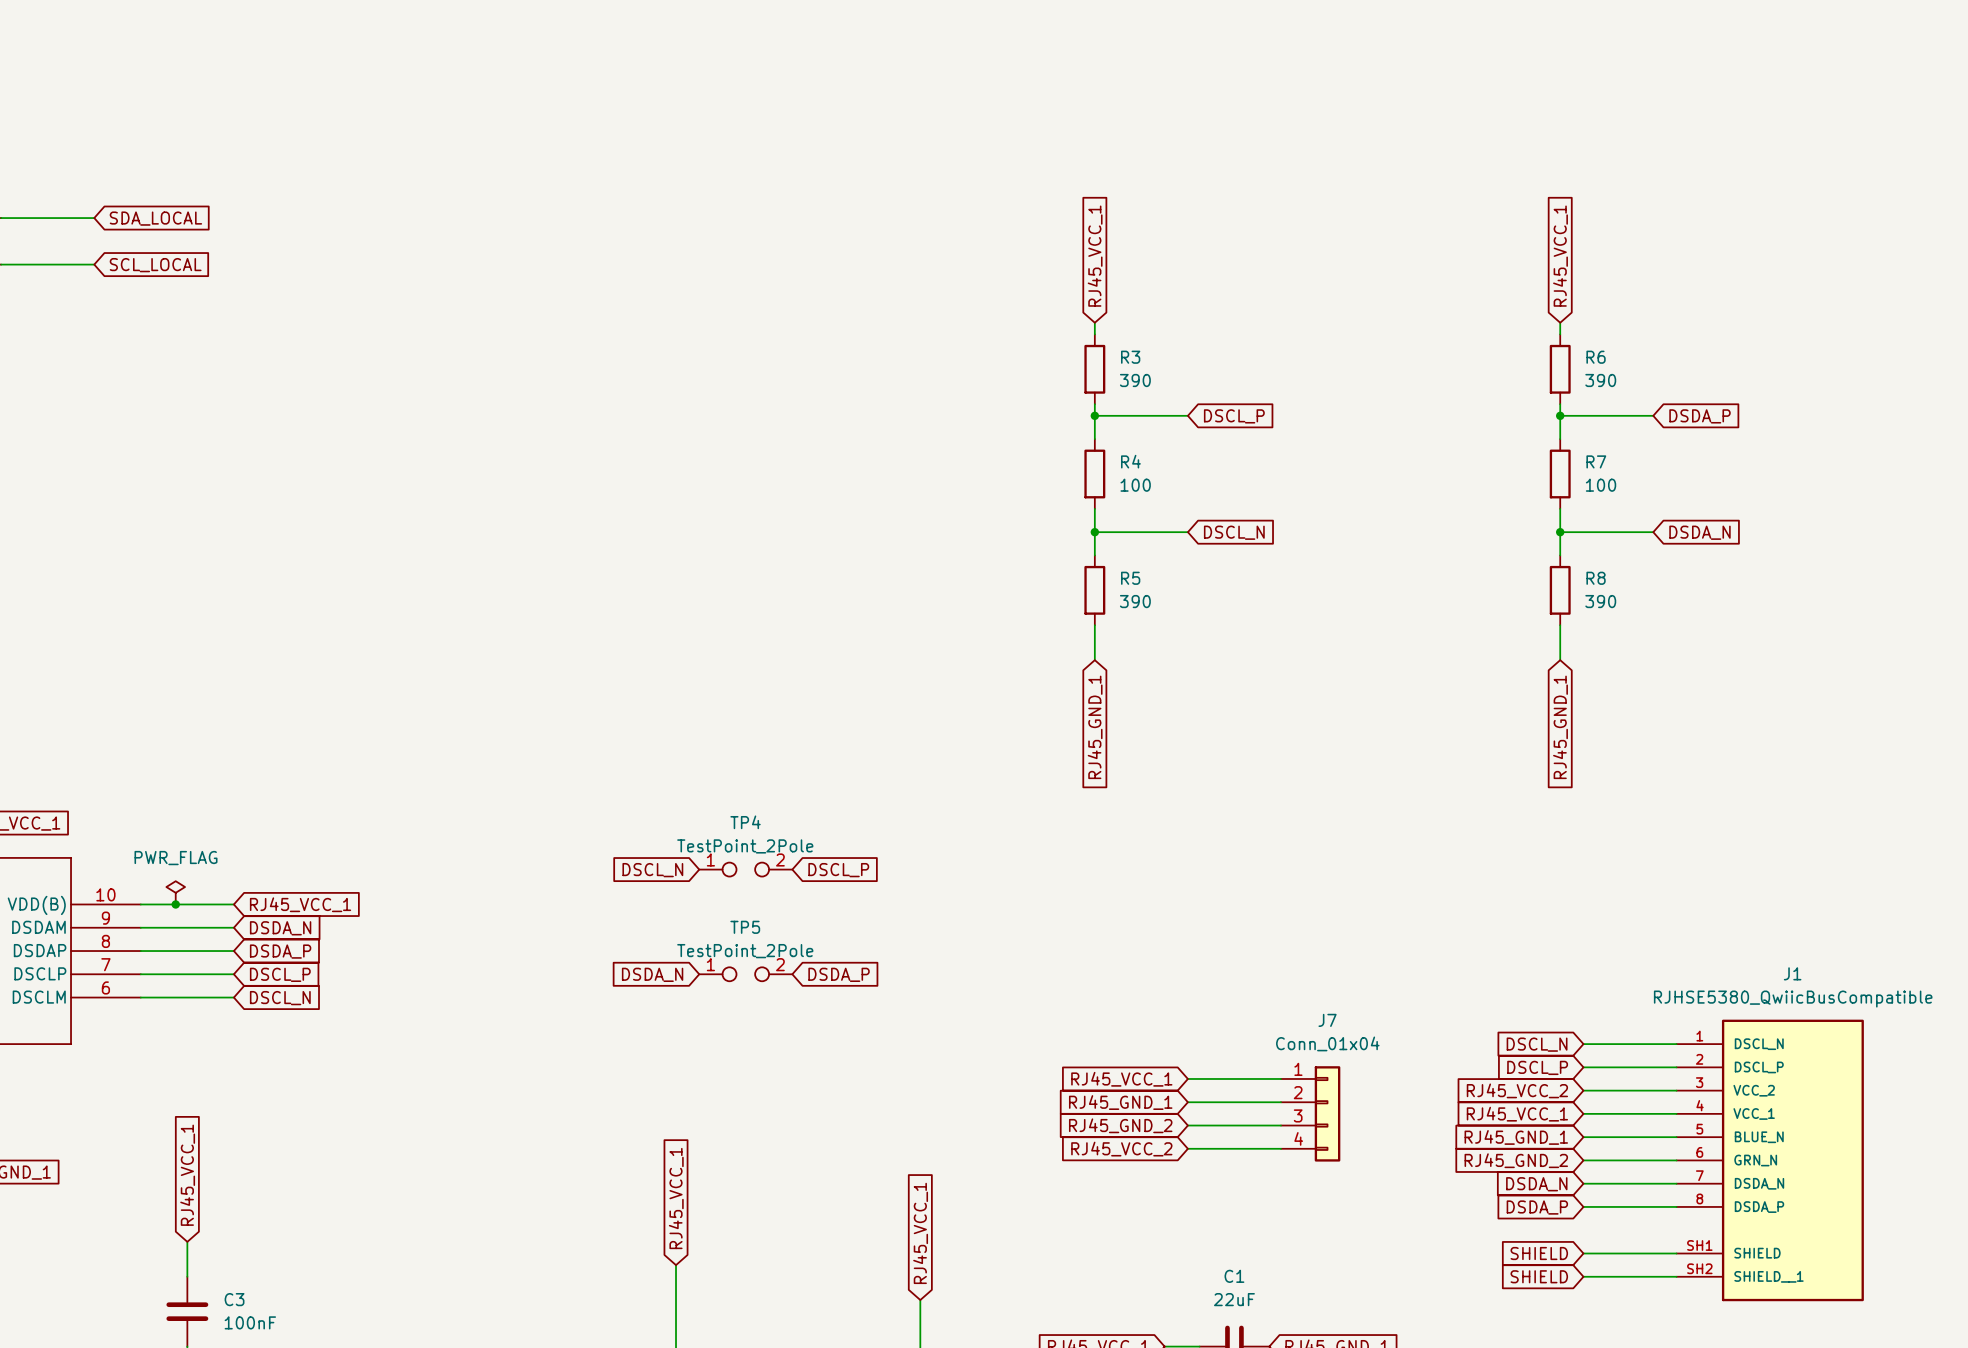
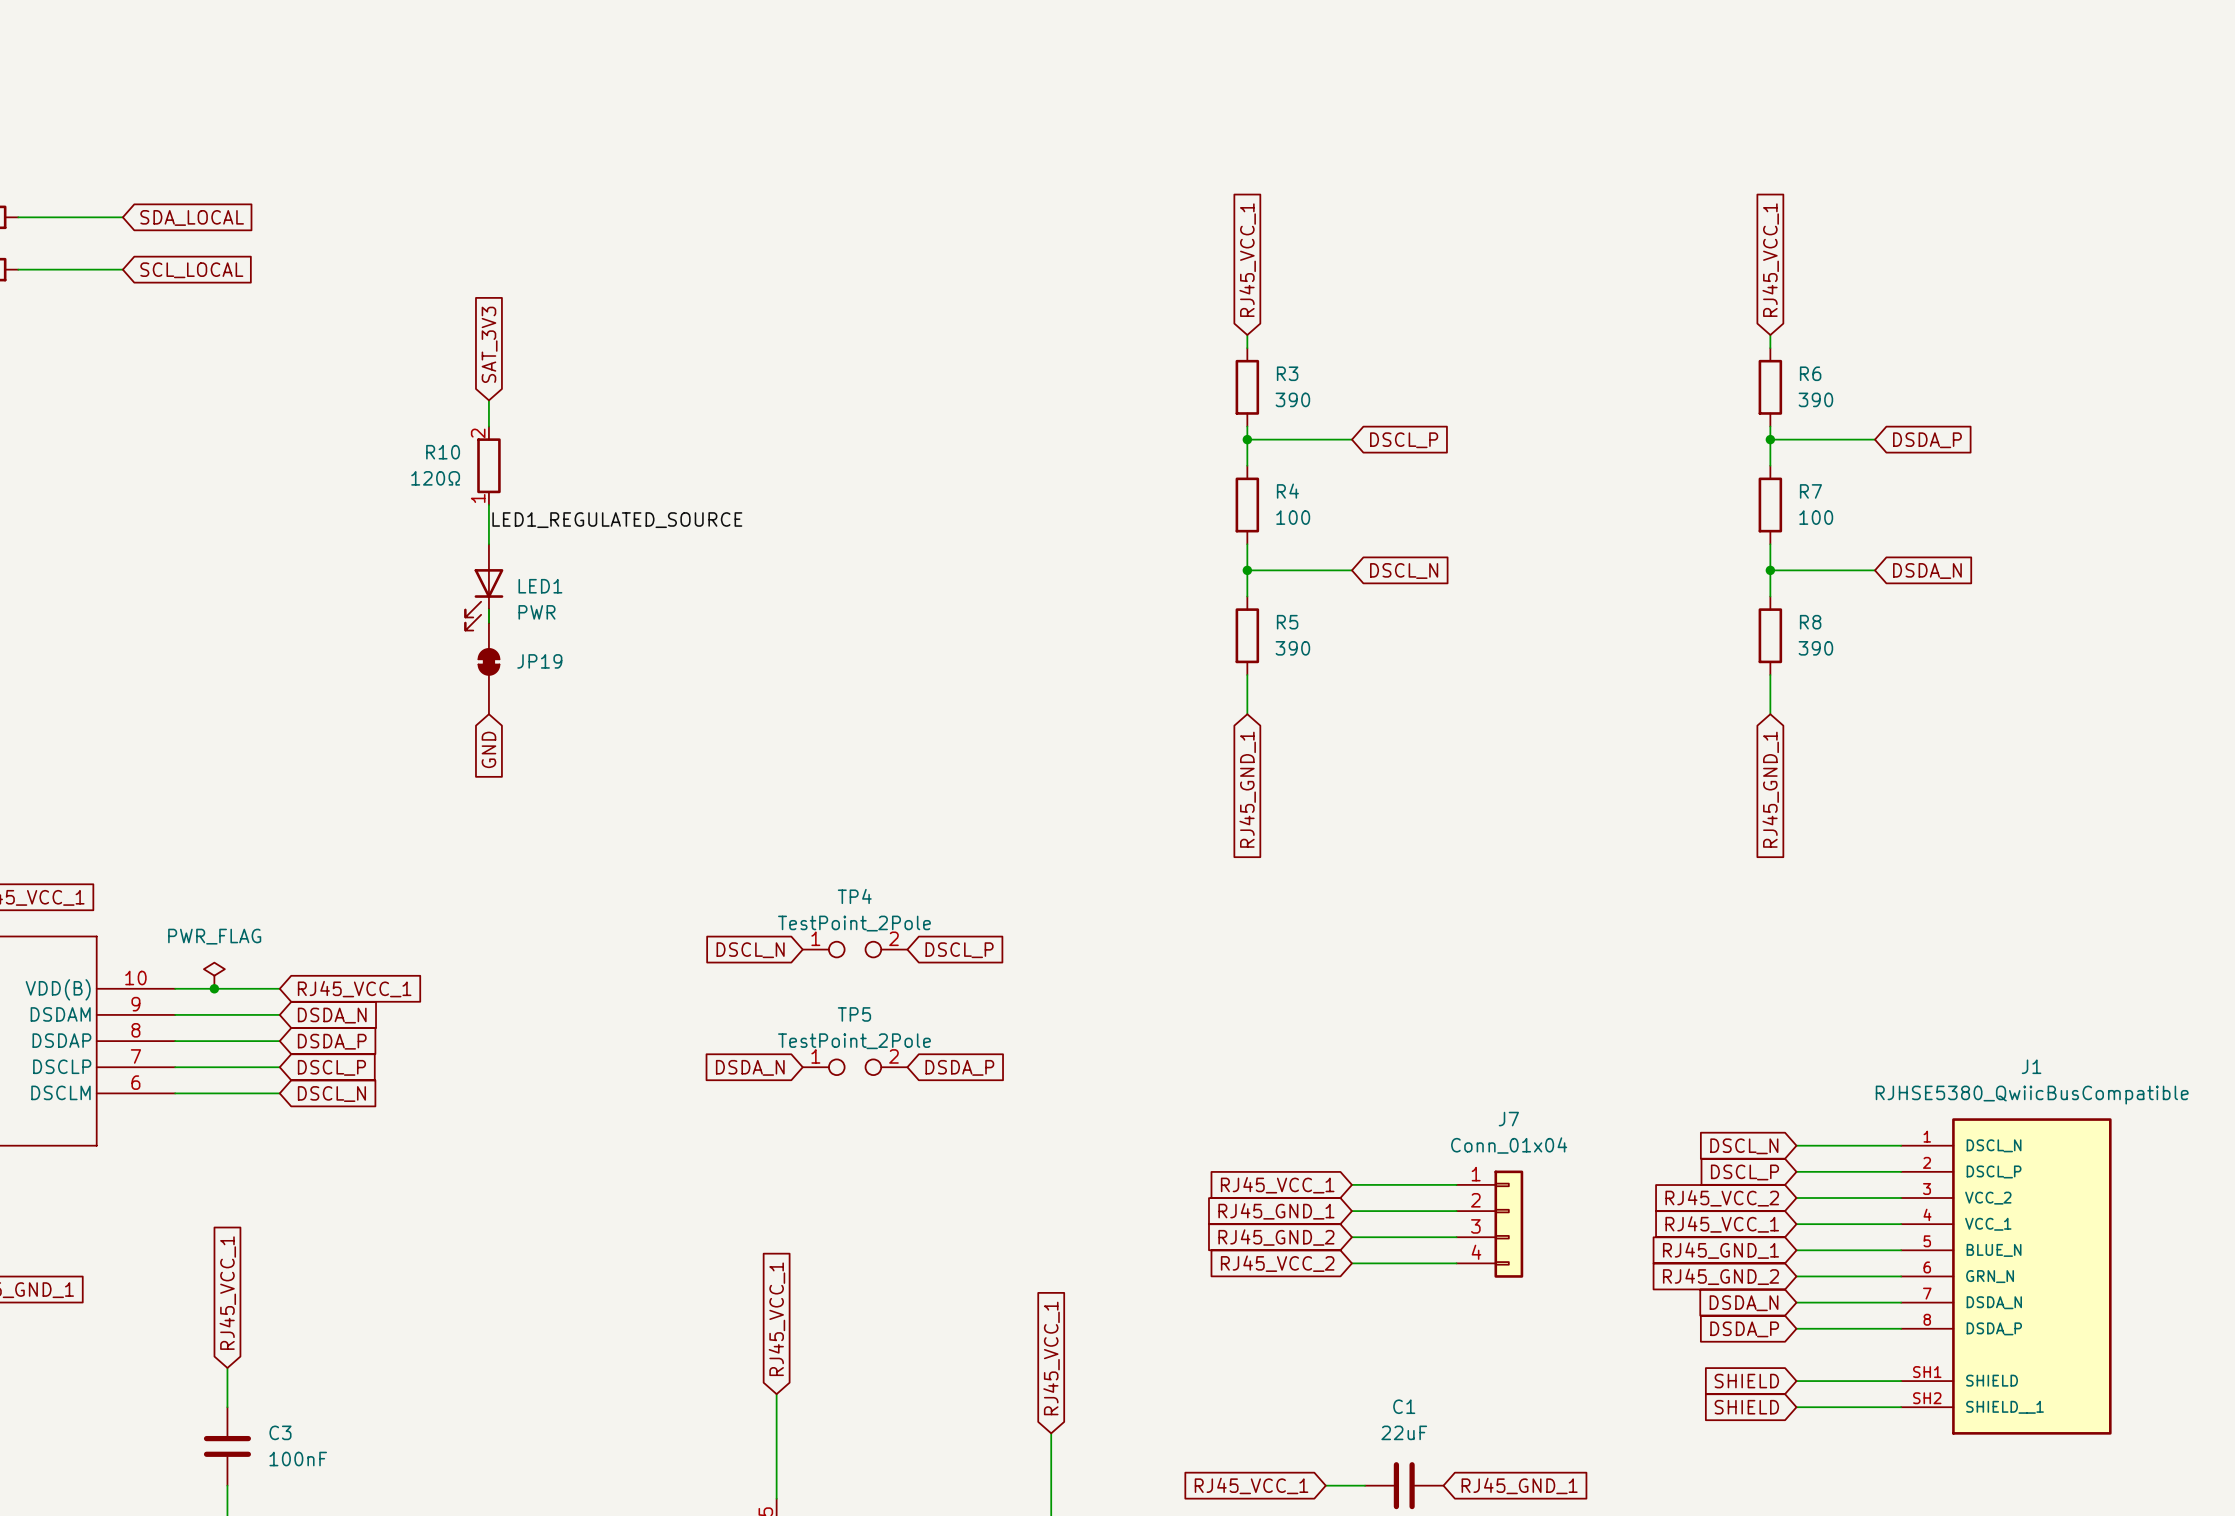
global label: none -> SAT_3V3 (489, 344)
wire: none -> (488, 400) (488, 426)
R10: none -> 120Ω (488, 465)
wire: none -> (488, 505) (488, 544)
label: none -> LED1_REGULATED_SOURCE (617, 520)
LED1: none -> PWR (484, 587)
wire: none -> (488, 609) (488, 622)
JP19: none -> (488, 661)
global label: none -> GND (488, 749)

